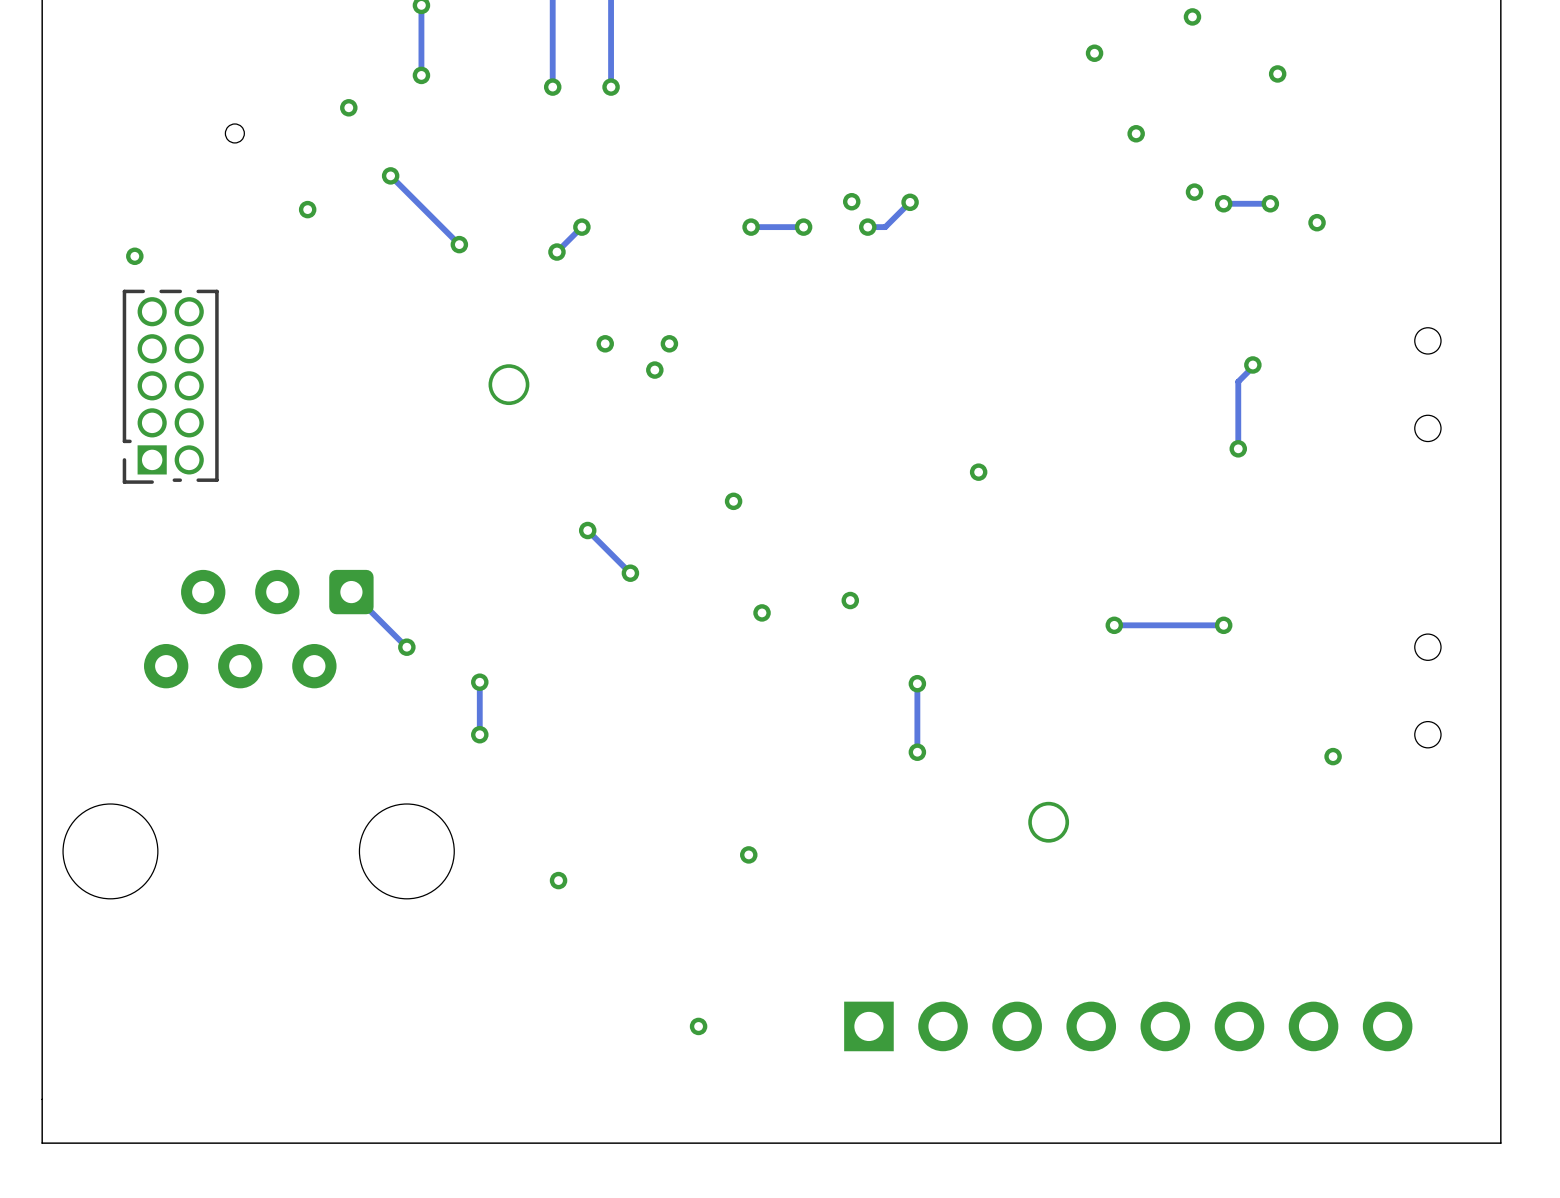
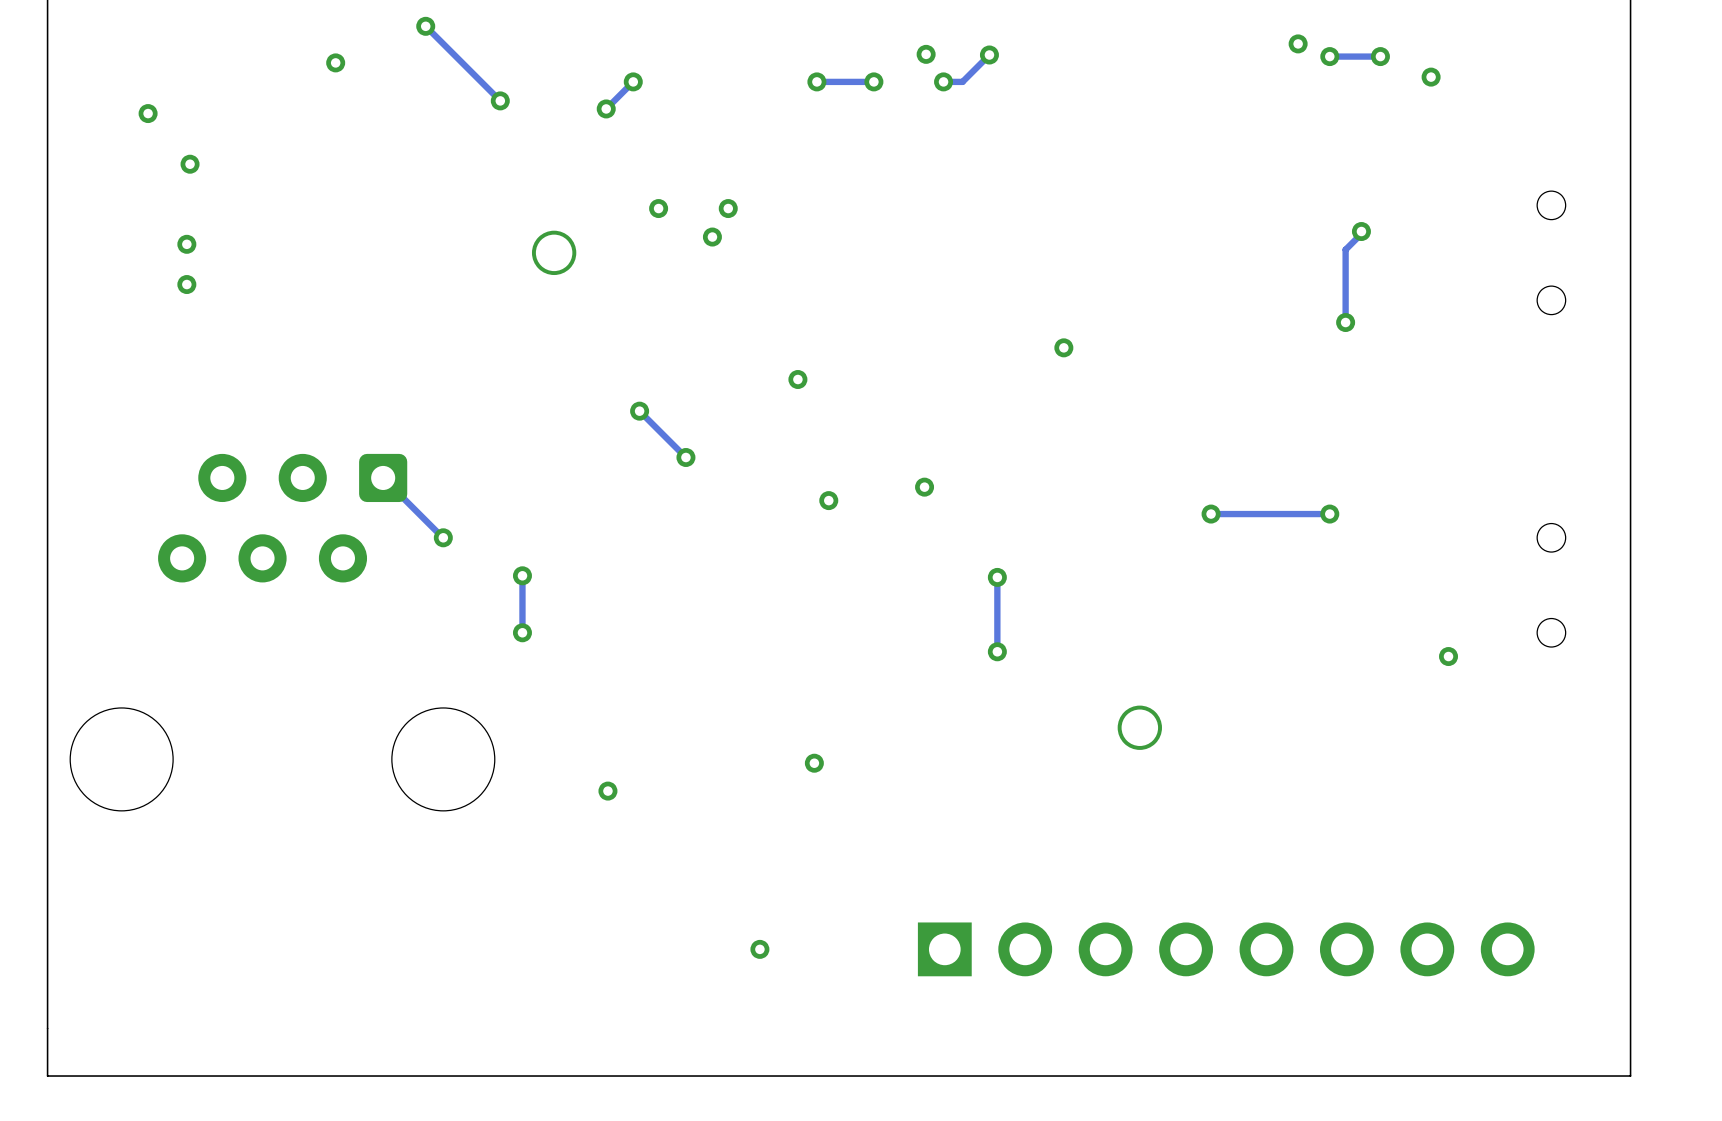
via: none -> (190, 164)
via: none -> (186, 244)
part: (170, 386) -> none
via: none -> (186, 284)

